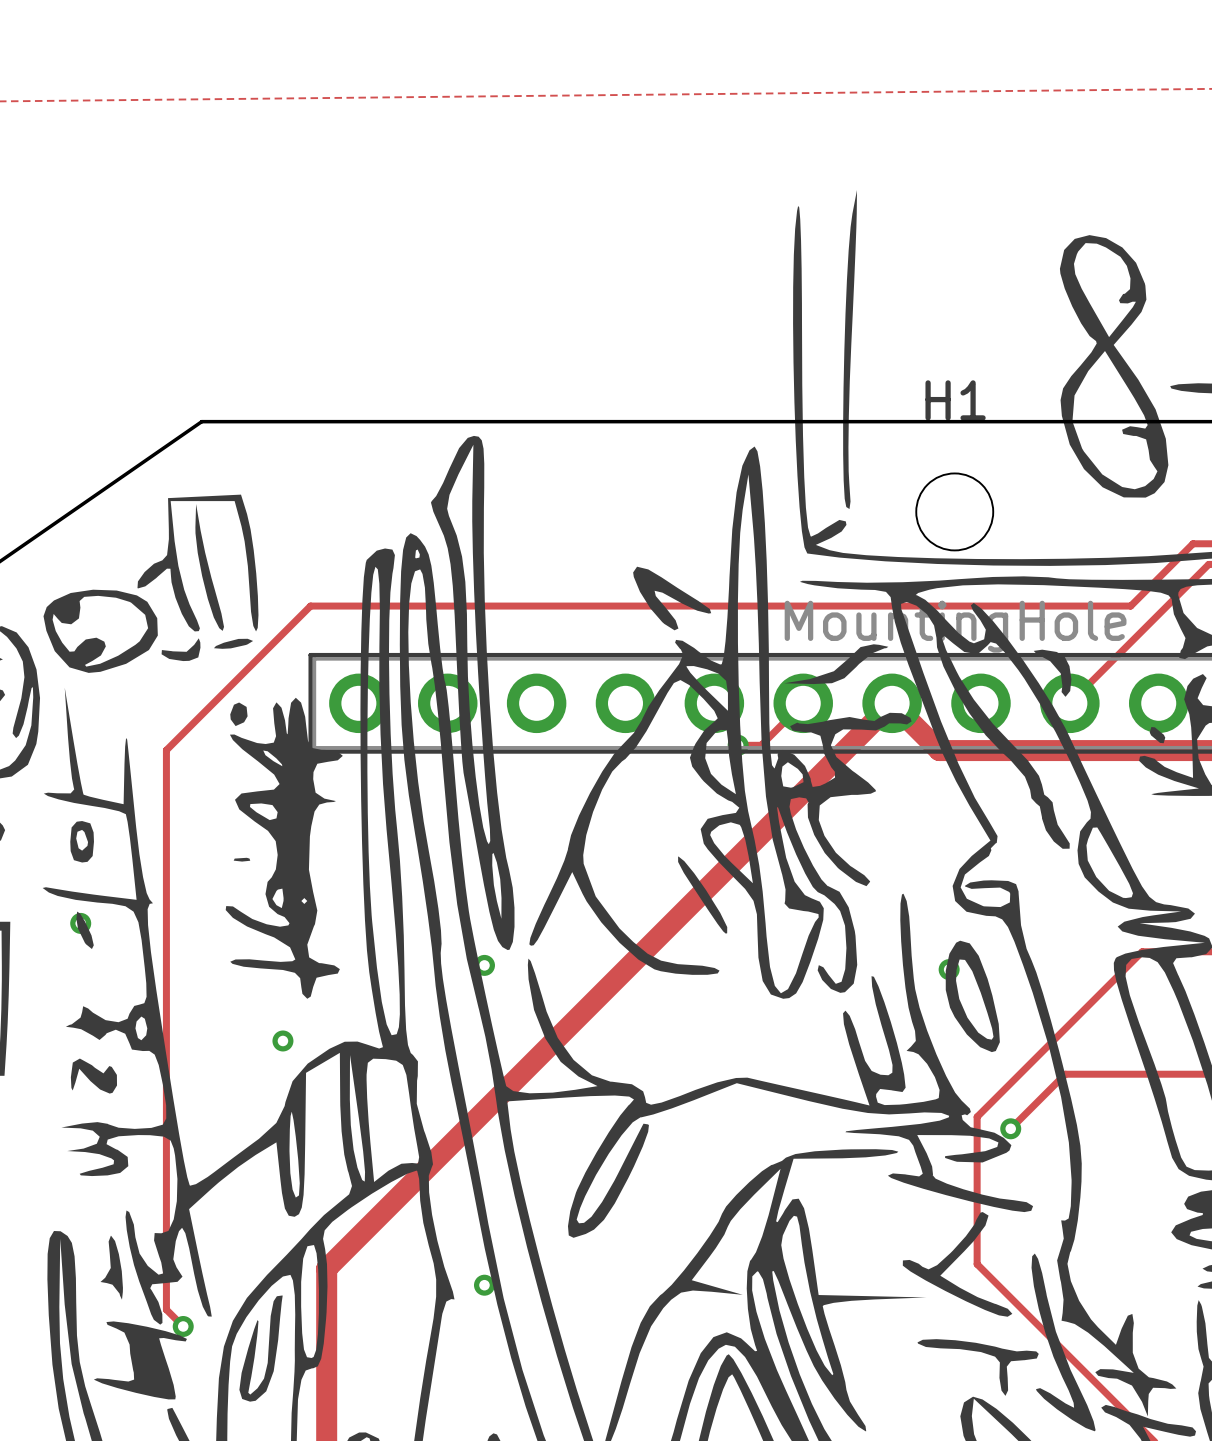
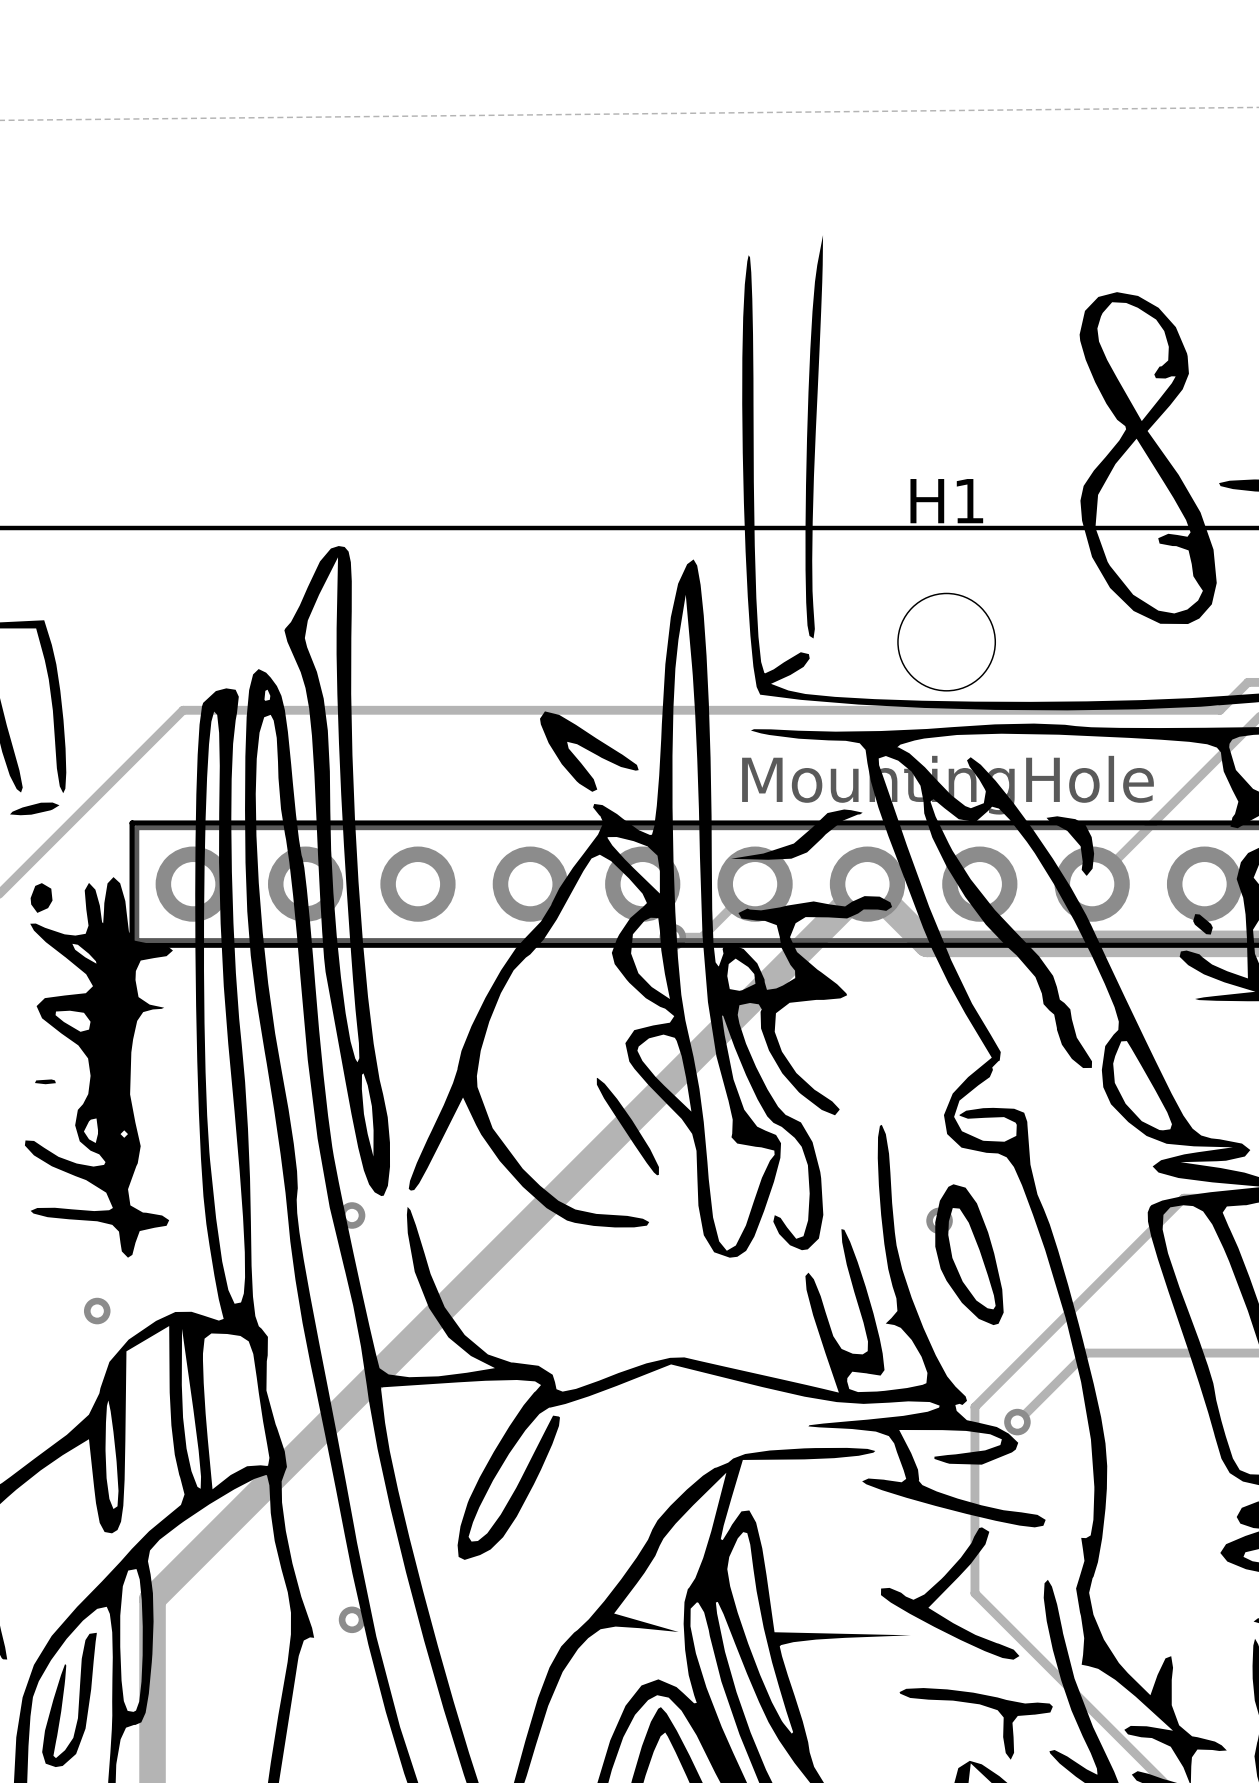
track: (1170, 565) (1130, 606) (310, 606) -> (1220, 710) (183, 710) (132, 761)

